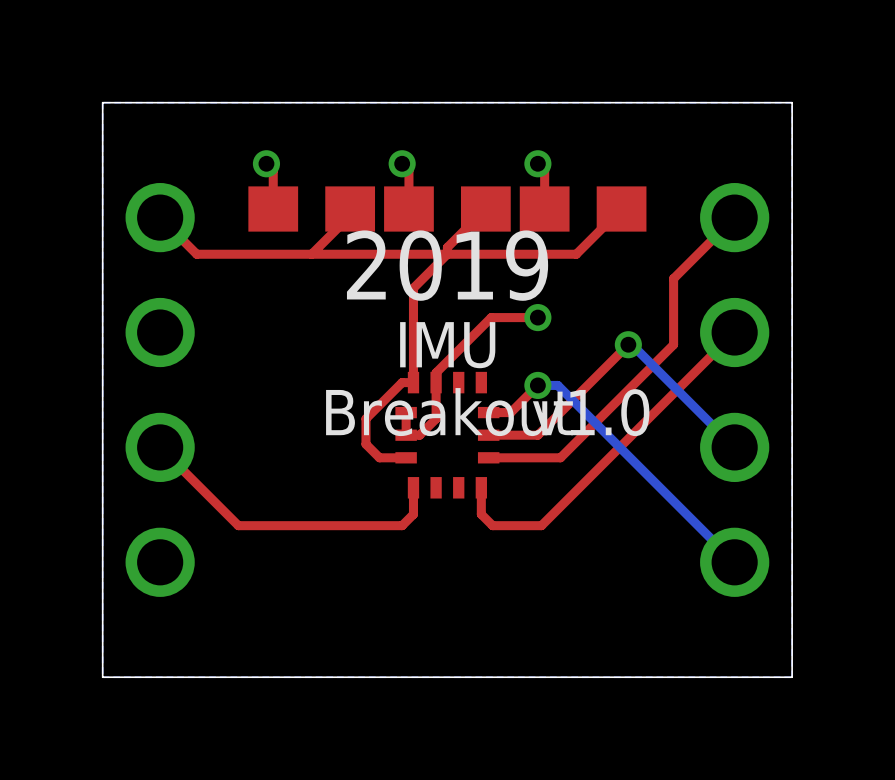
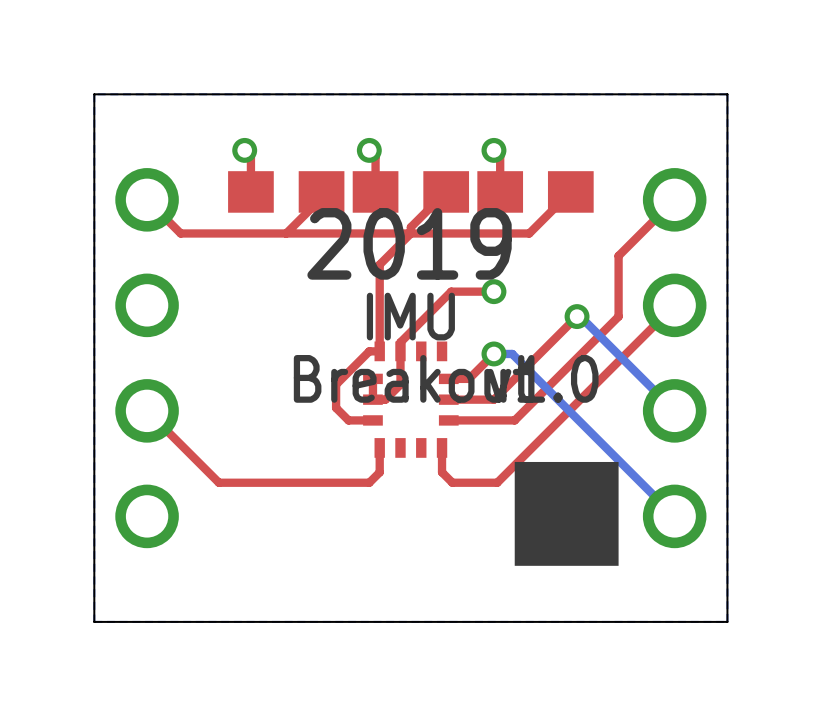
drawing: none -> [514, 461, 619, 566]

